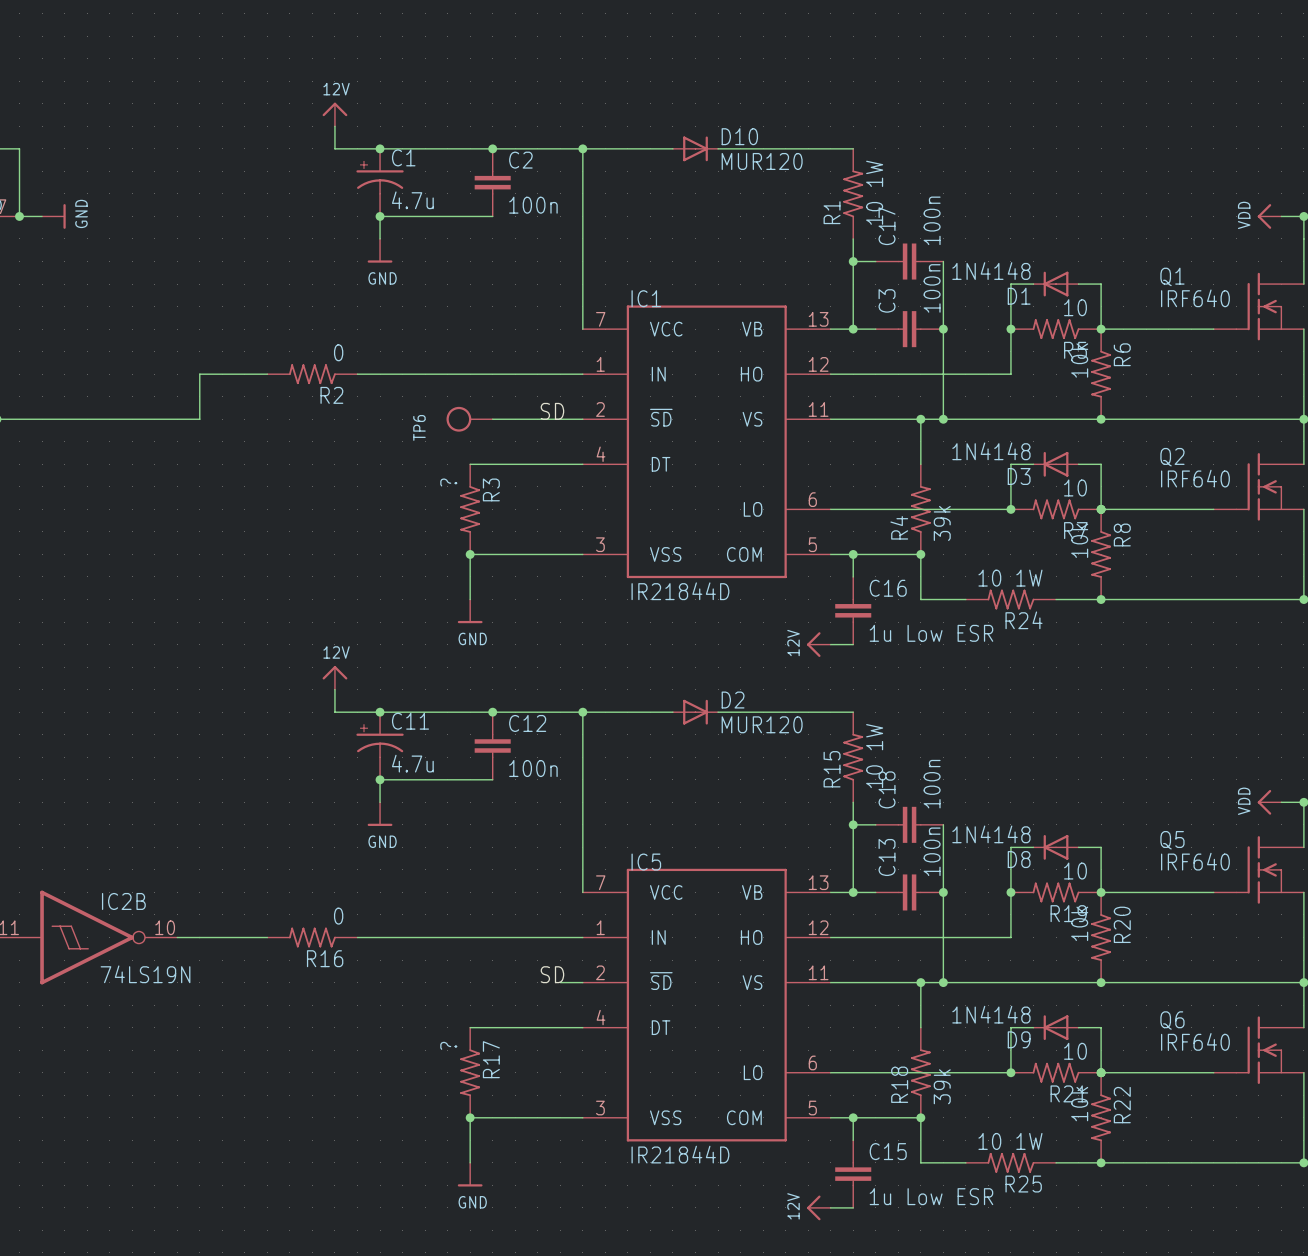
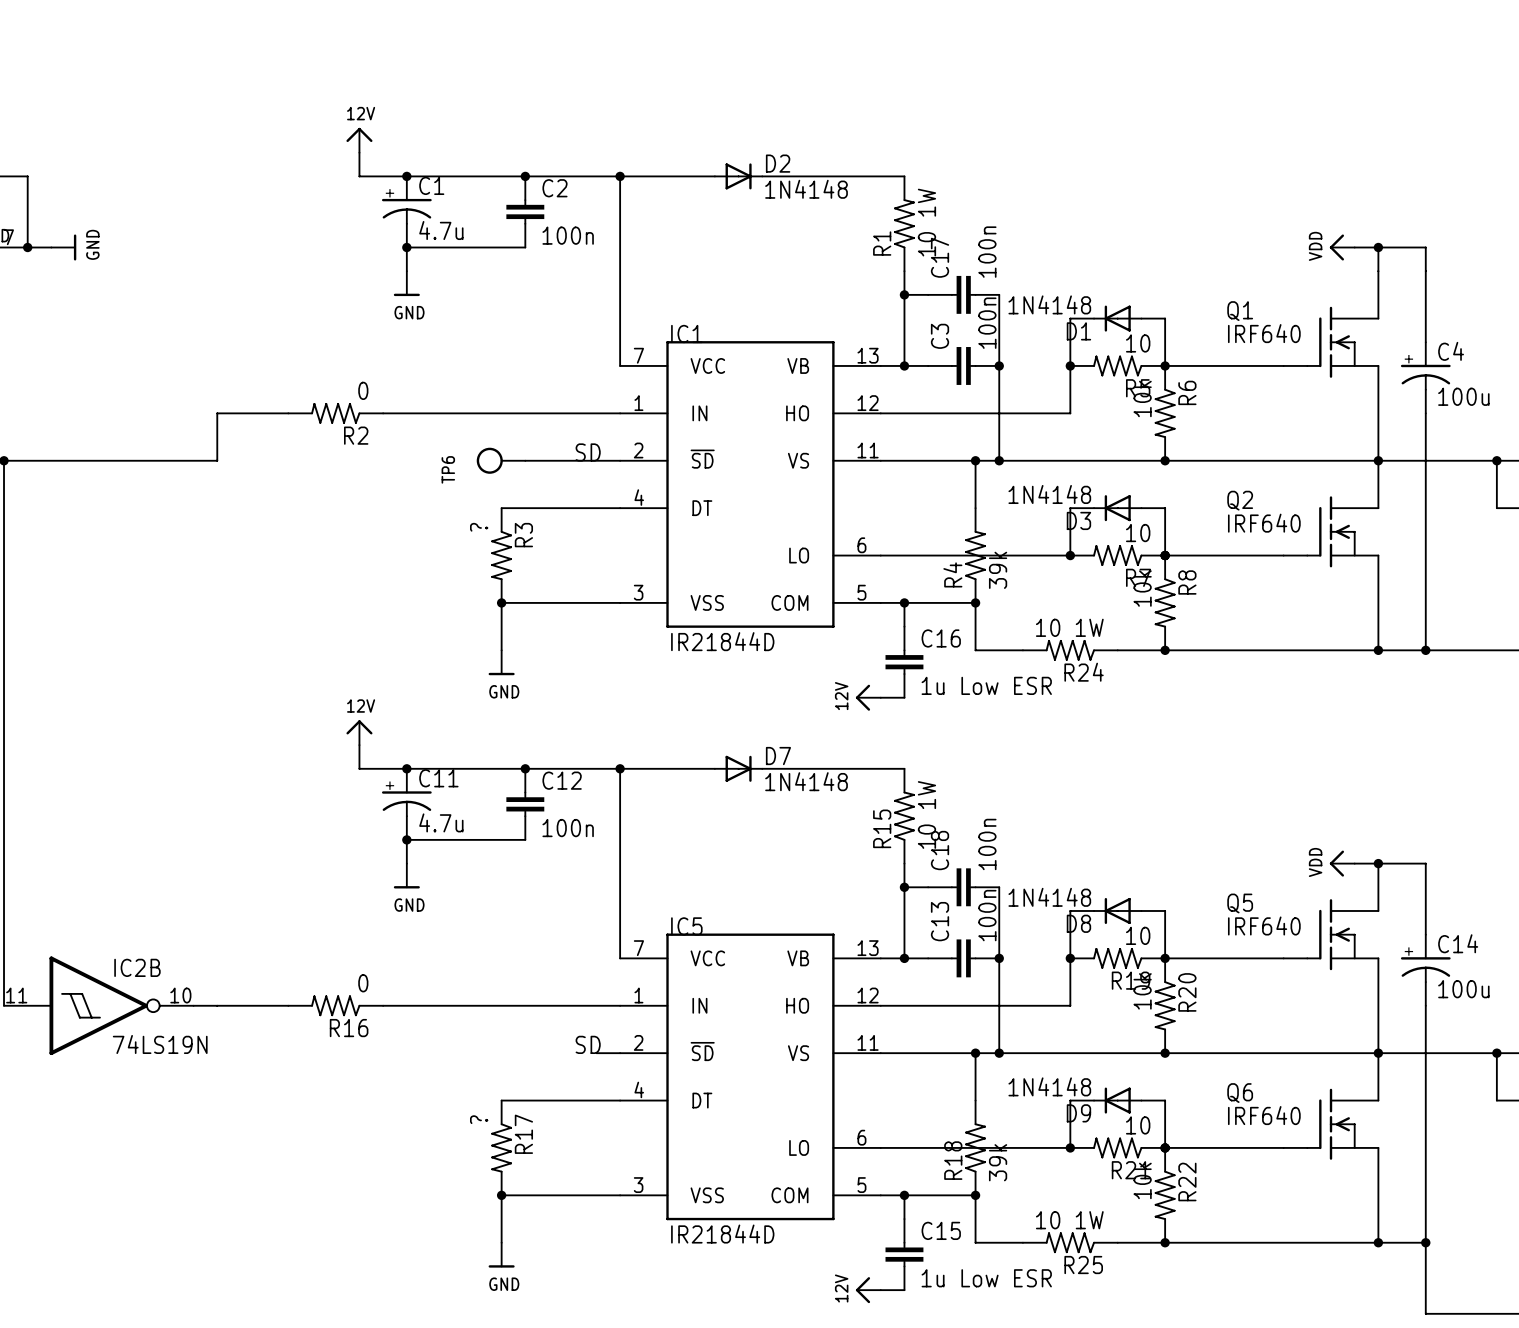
D10 name: D10 (739, 136) -> D2 (778, 163)
D10 value: MUR120 (762, 161) -> 1N4148 (806, 189)
D2 name: D2 (733, 700) -> D7 (778, 756)
D2 value: MUR120 (762, 724) -> 1N4148 (806, 781)

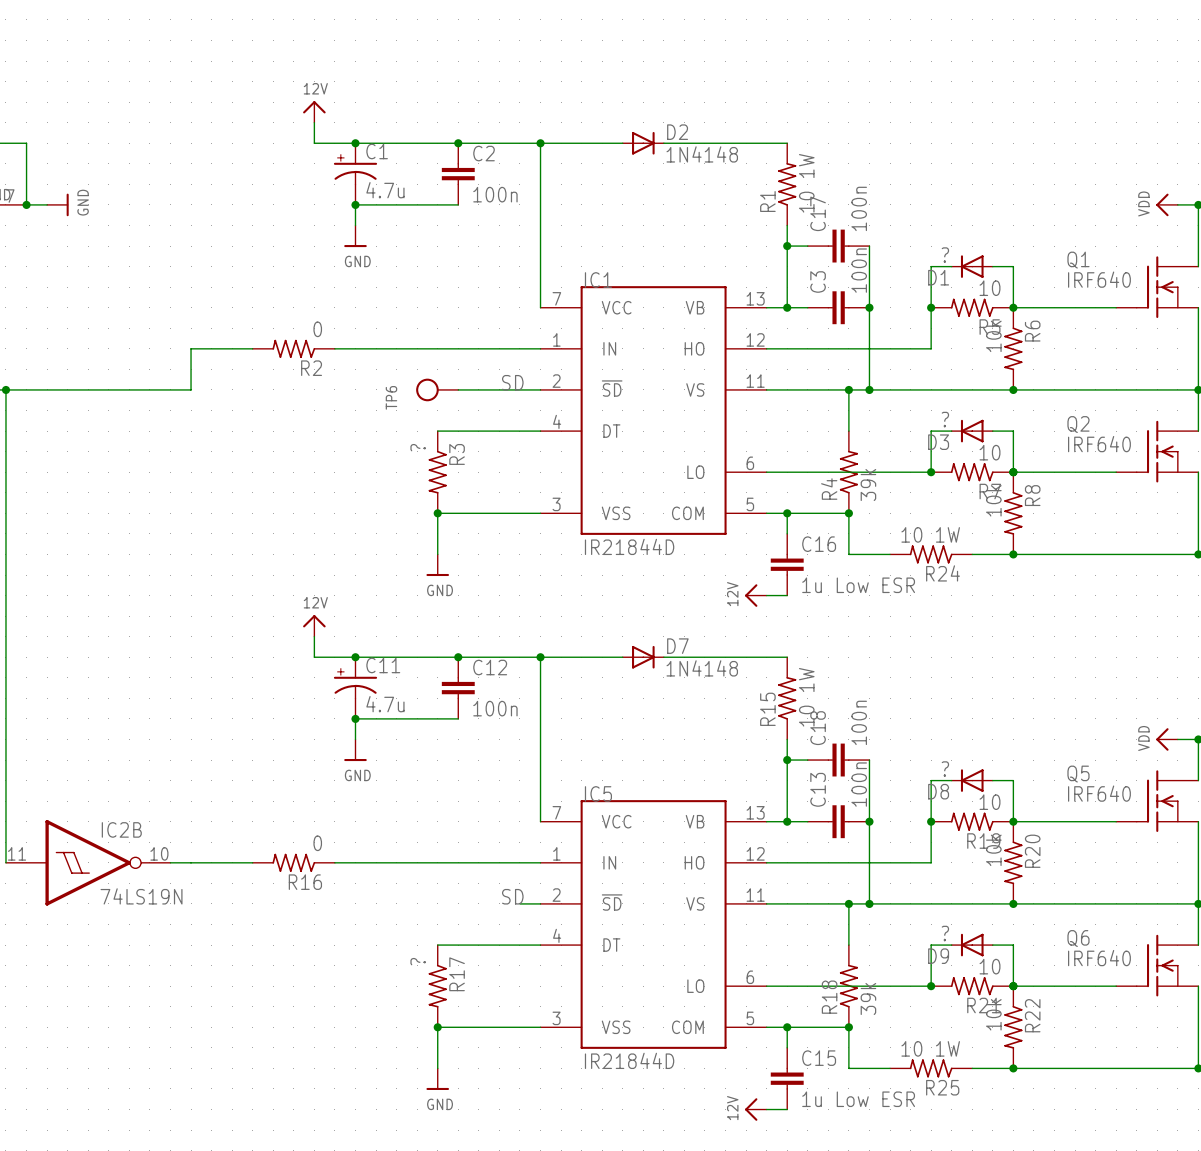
D1 value: 1N4148 (1049, 304) -> ? (945, 255)
D3 value: 1N4148 (1049, 494) -> ? (945, 419)
D8 value: 1N4148 (1049, 897) -> ? (945, 769)
D9 value: 1N4148 (1049, 1086) -> ? (945, 933)

